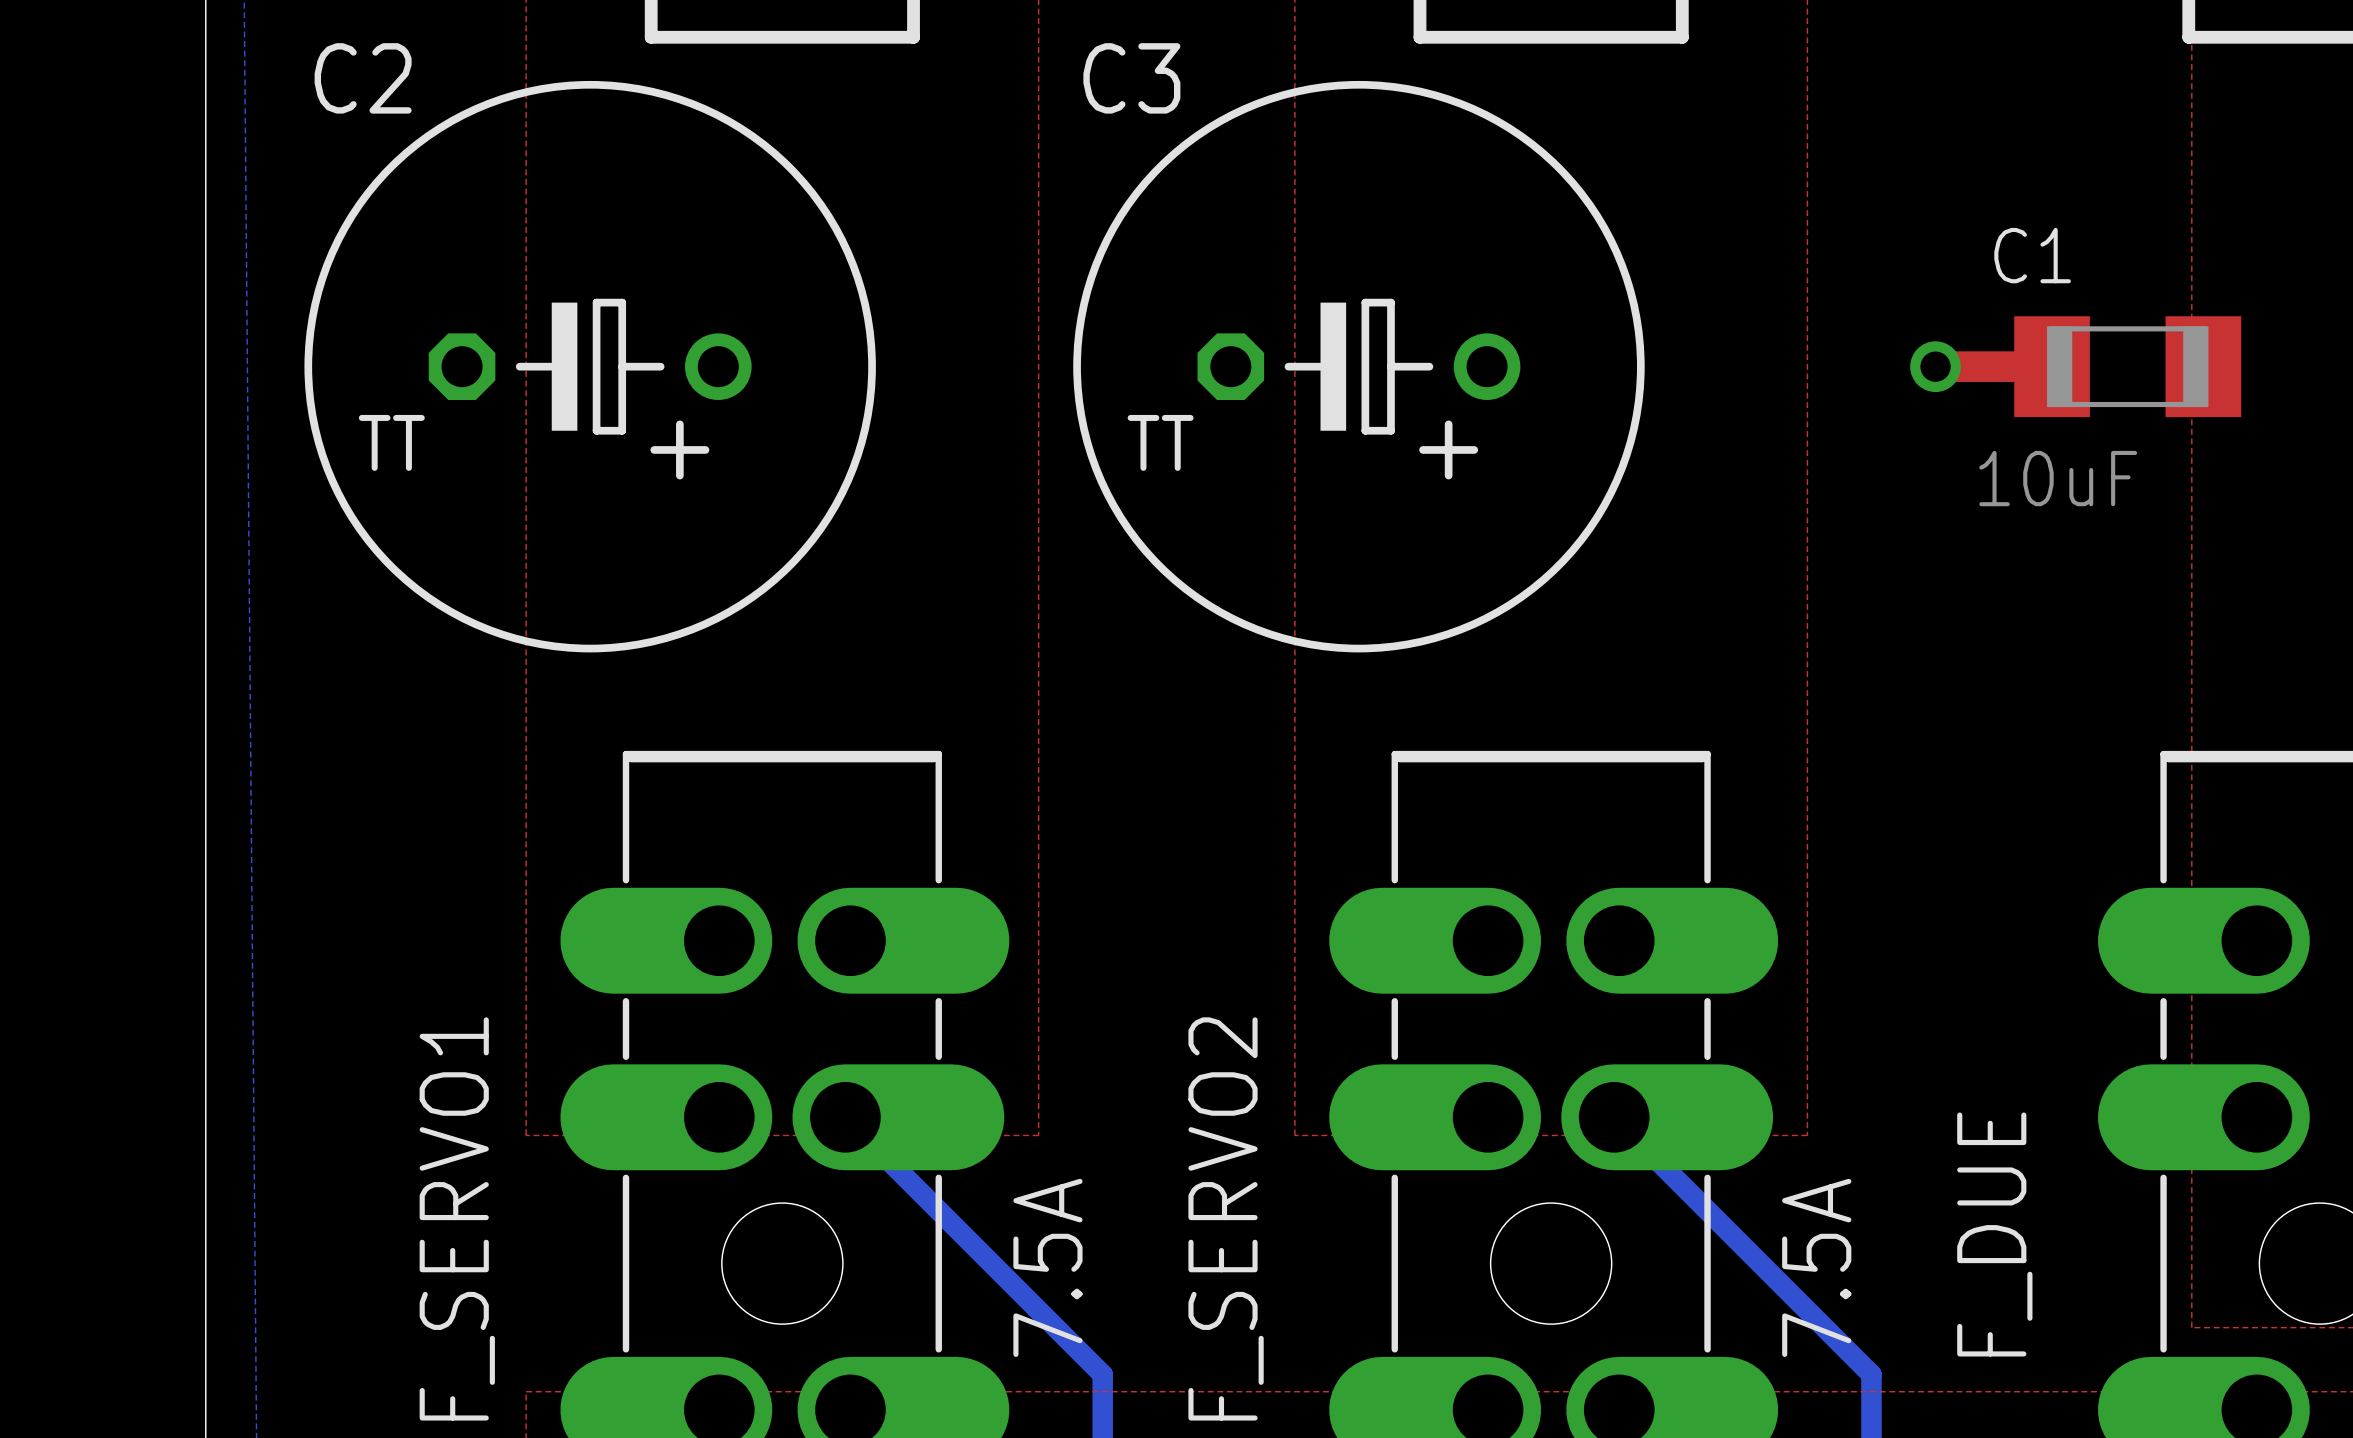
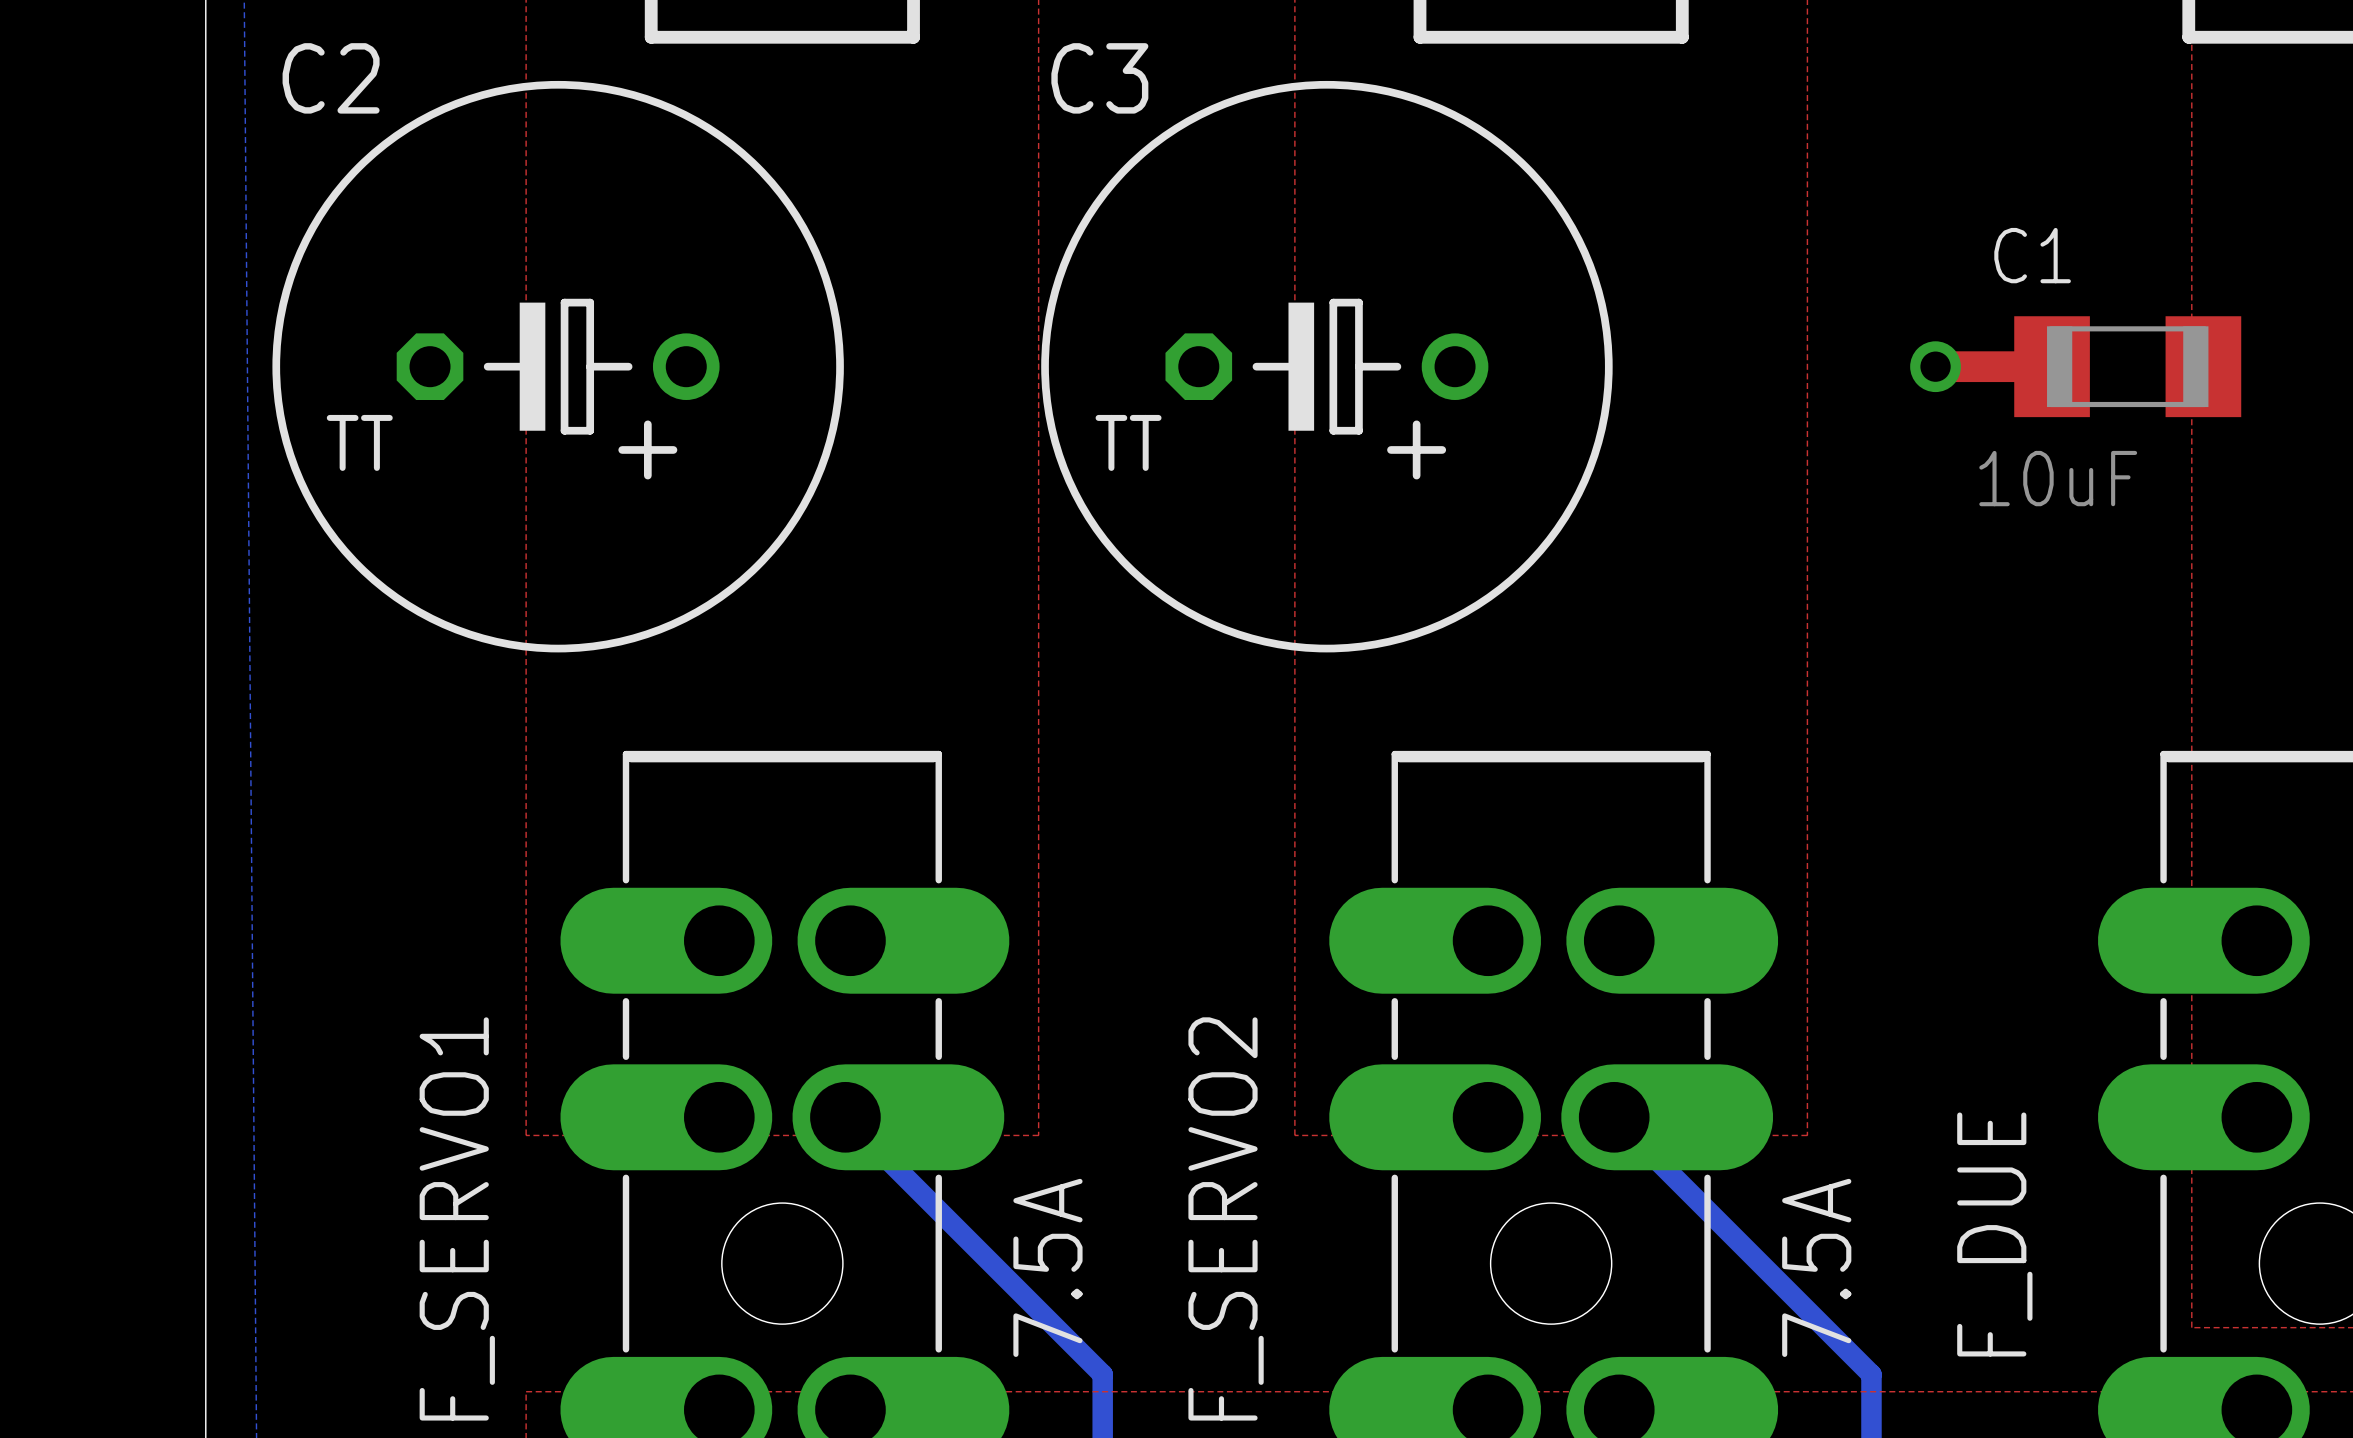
C2 position: (590, 366) -> (558, 366)
C3 position: (1358, 366) -> (1326, 366)

